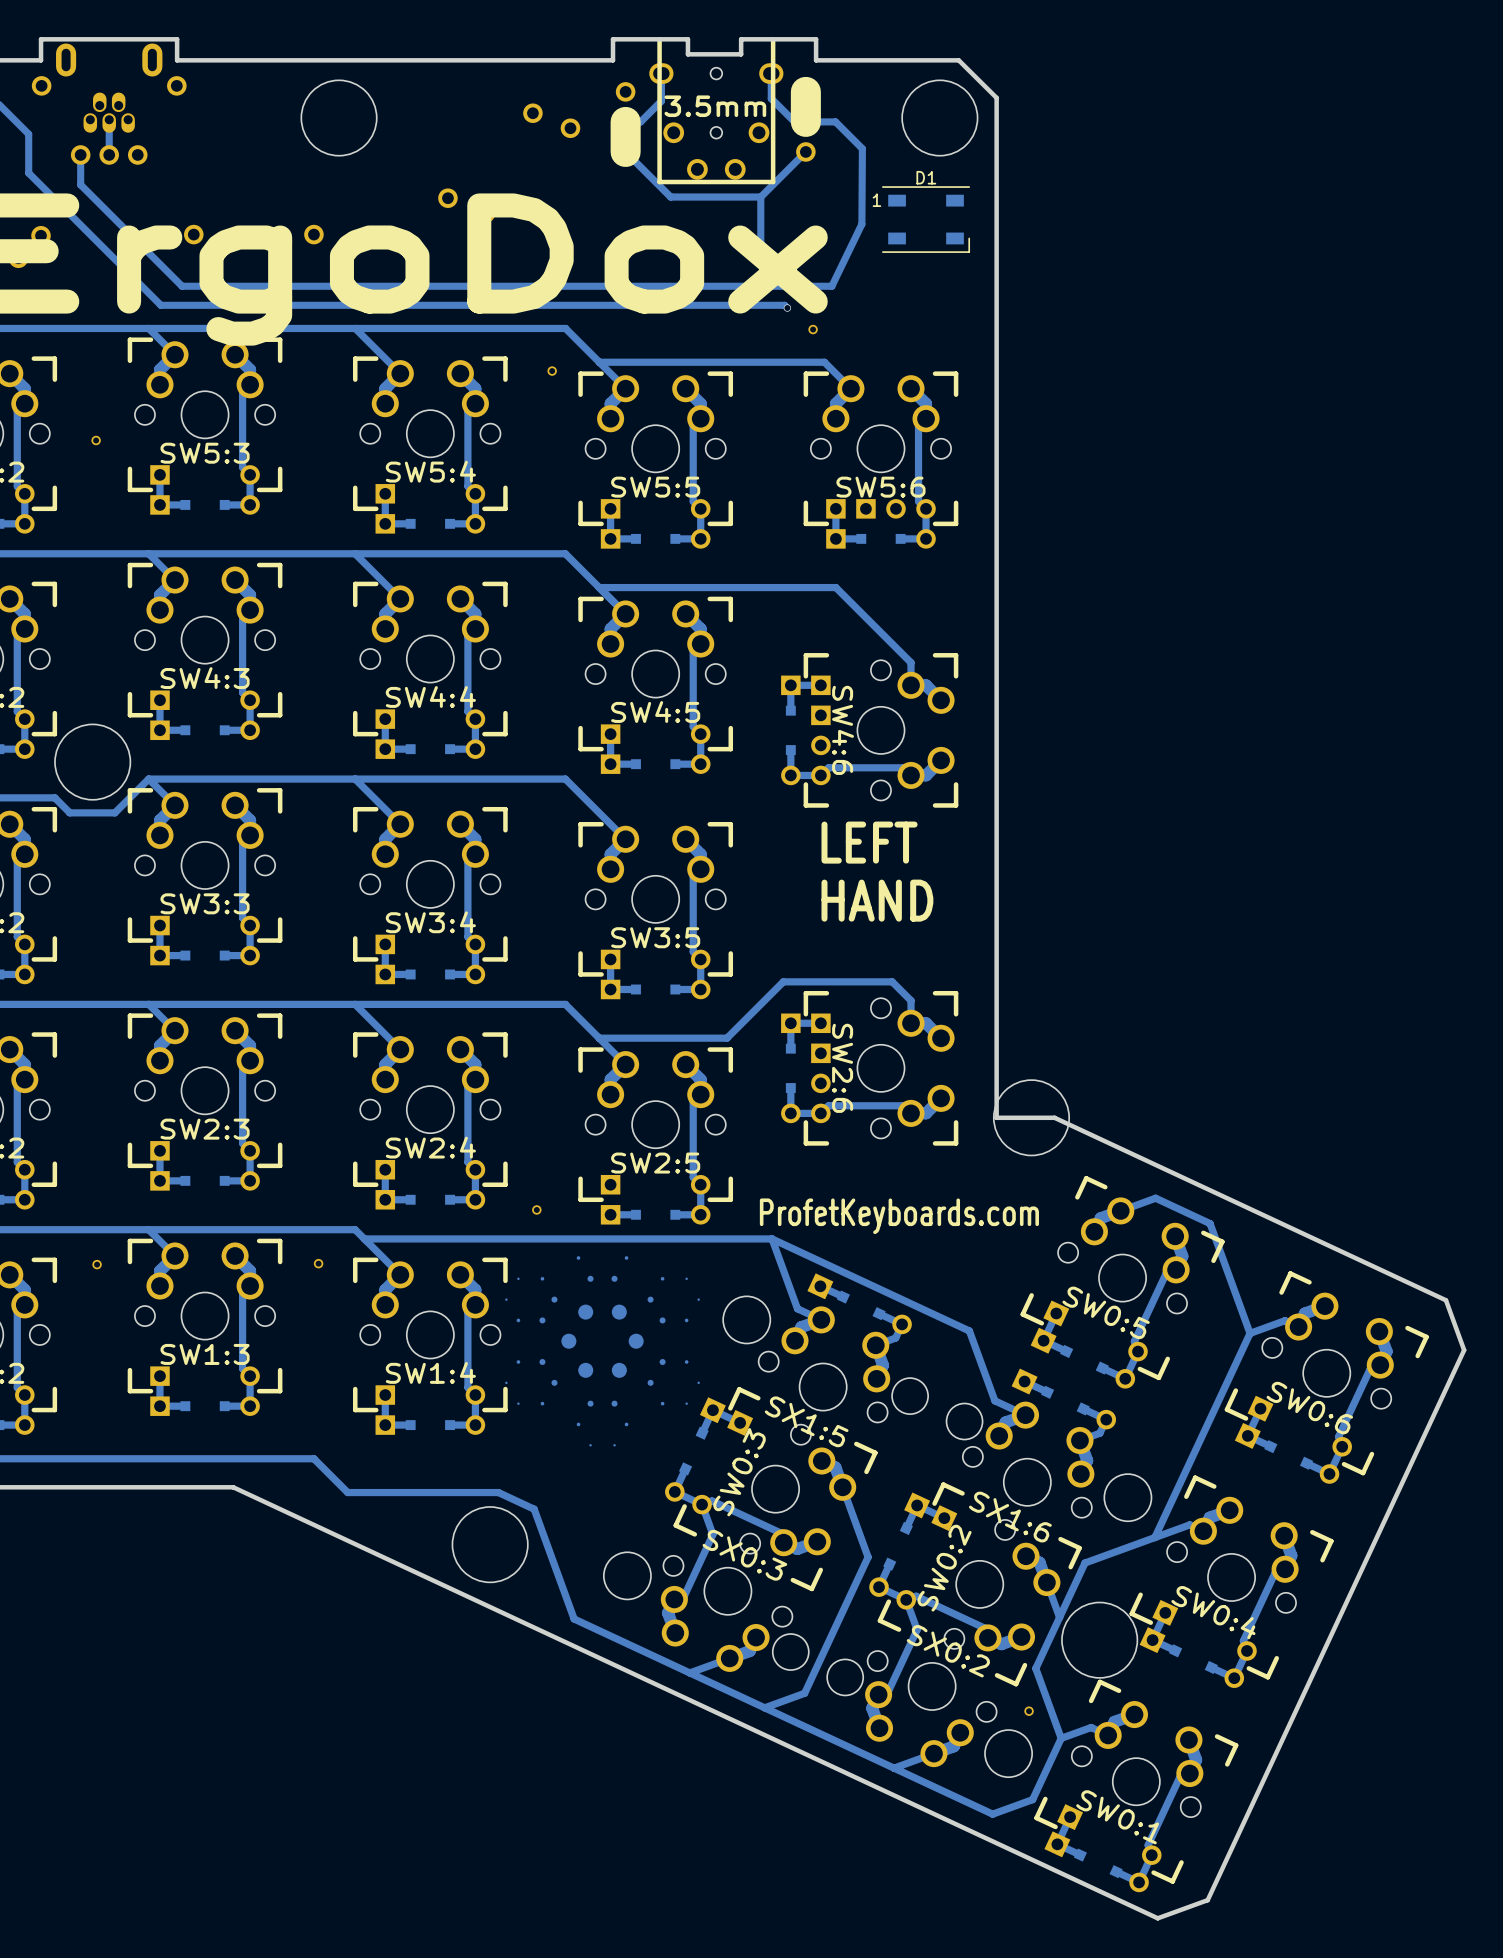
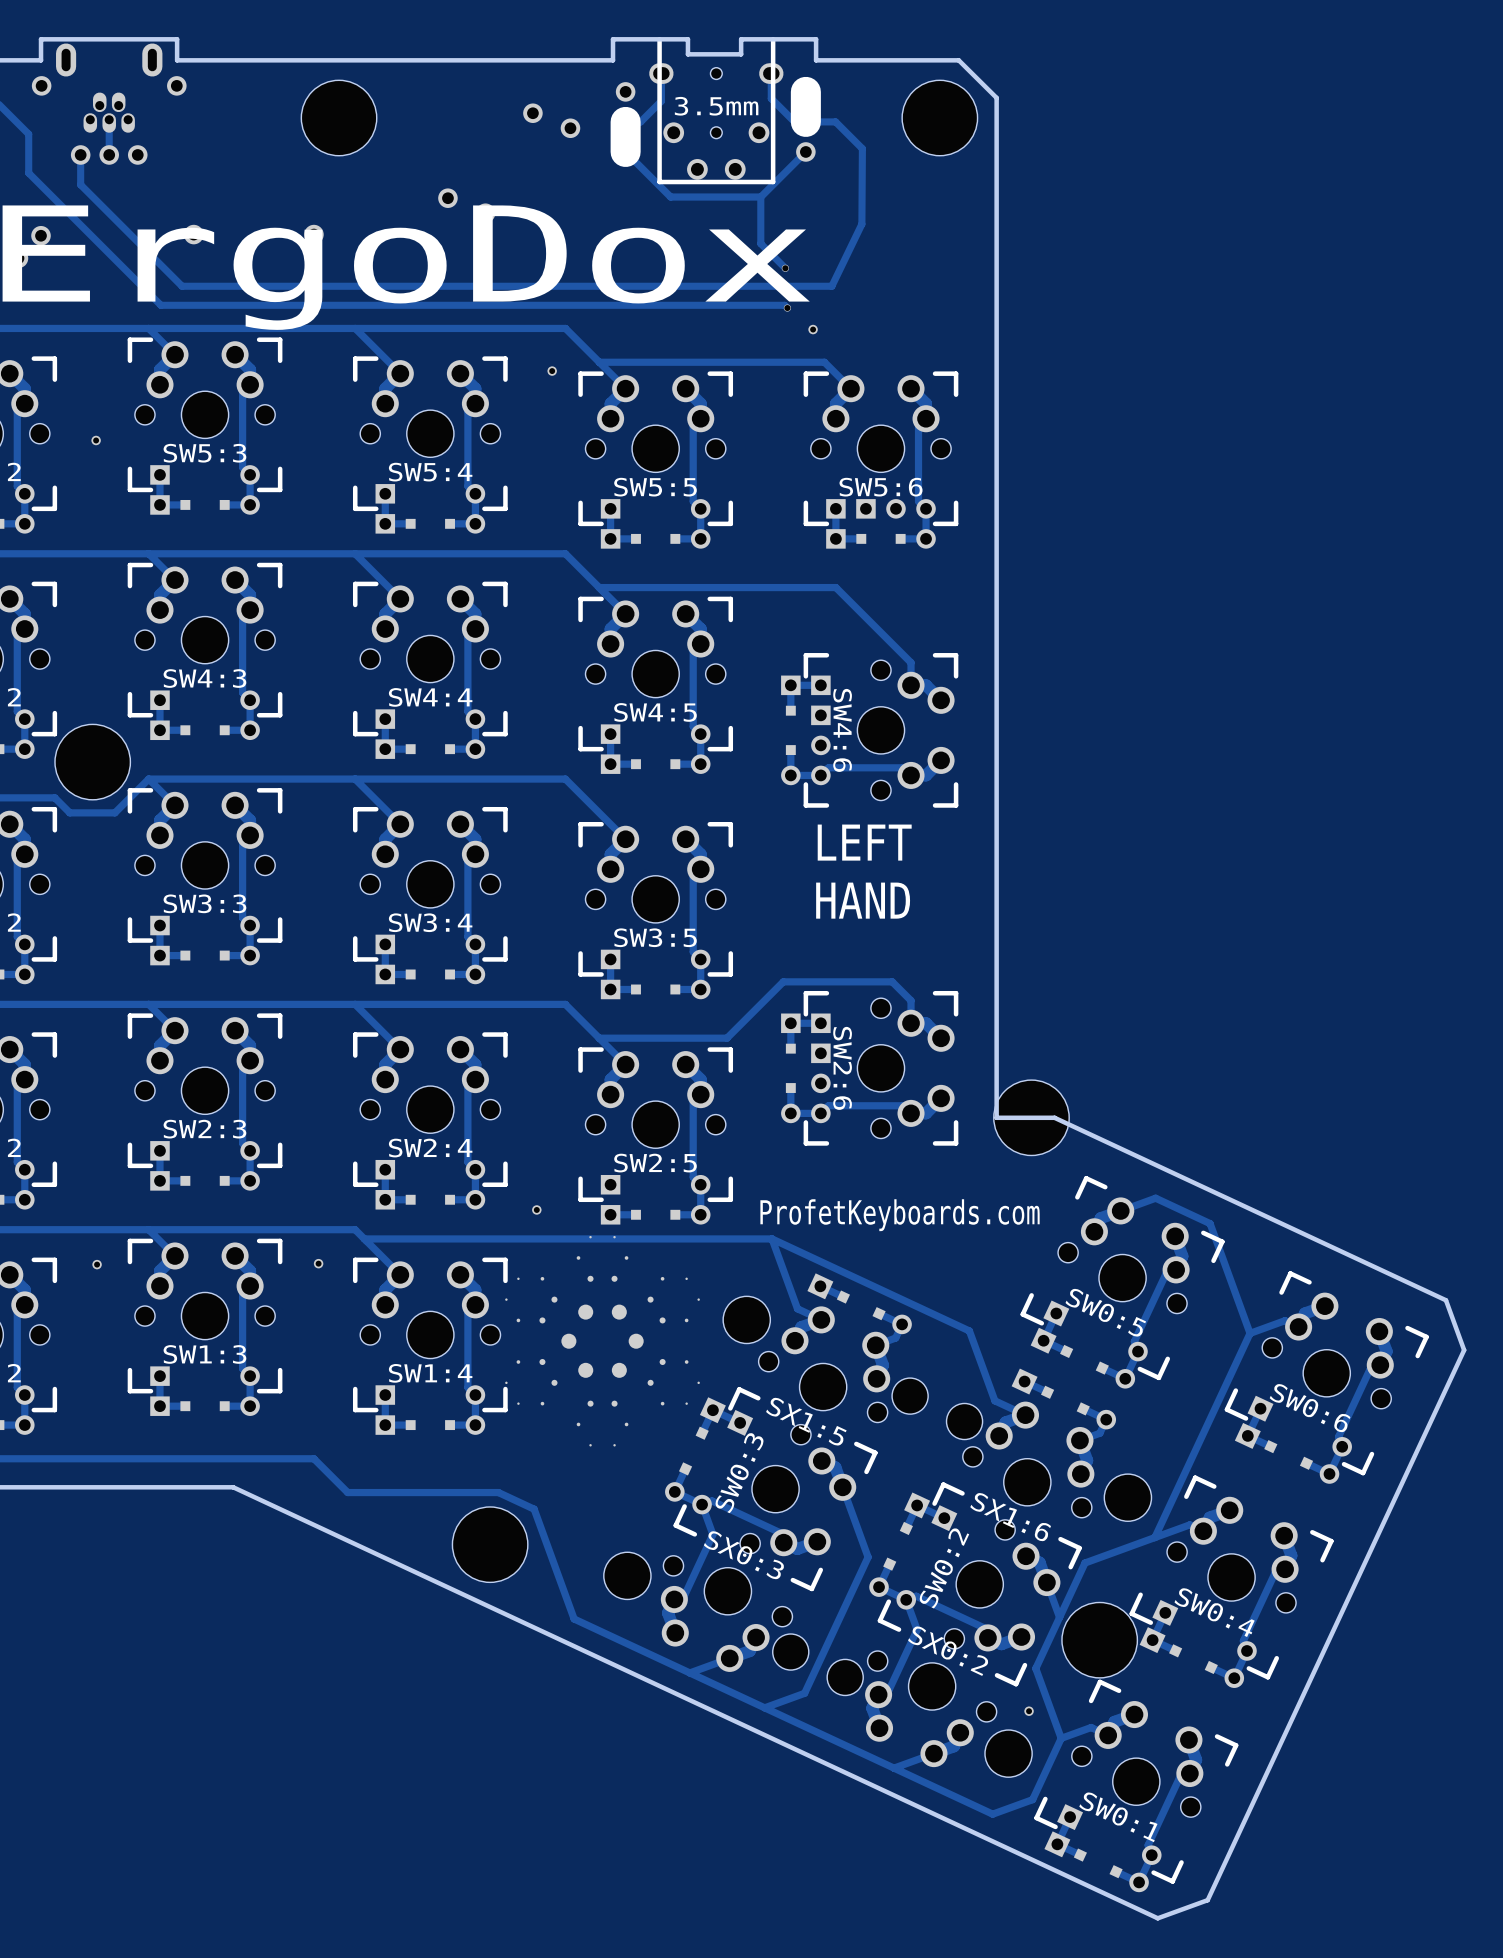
D1: (926, 219) -> none

